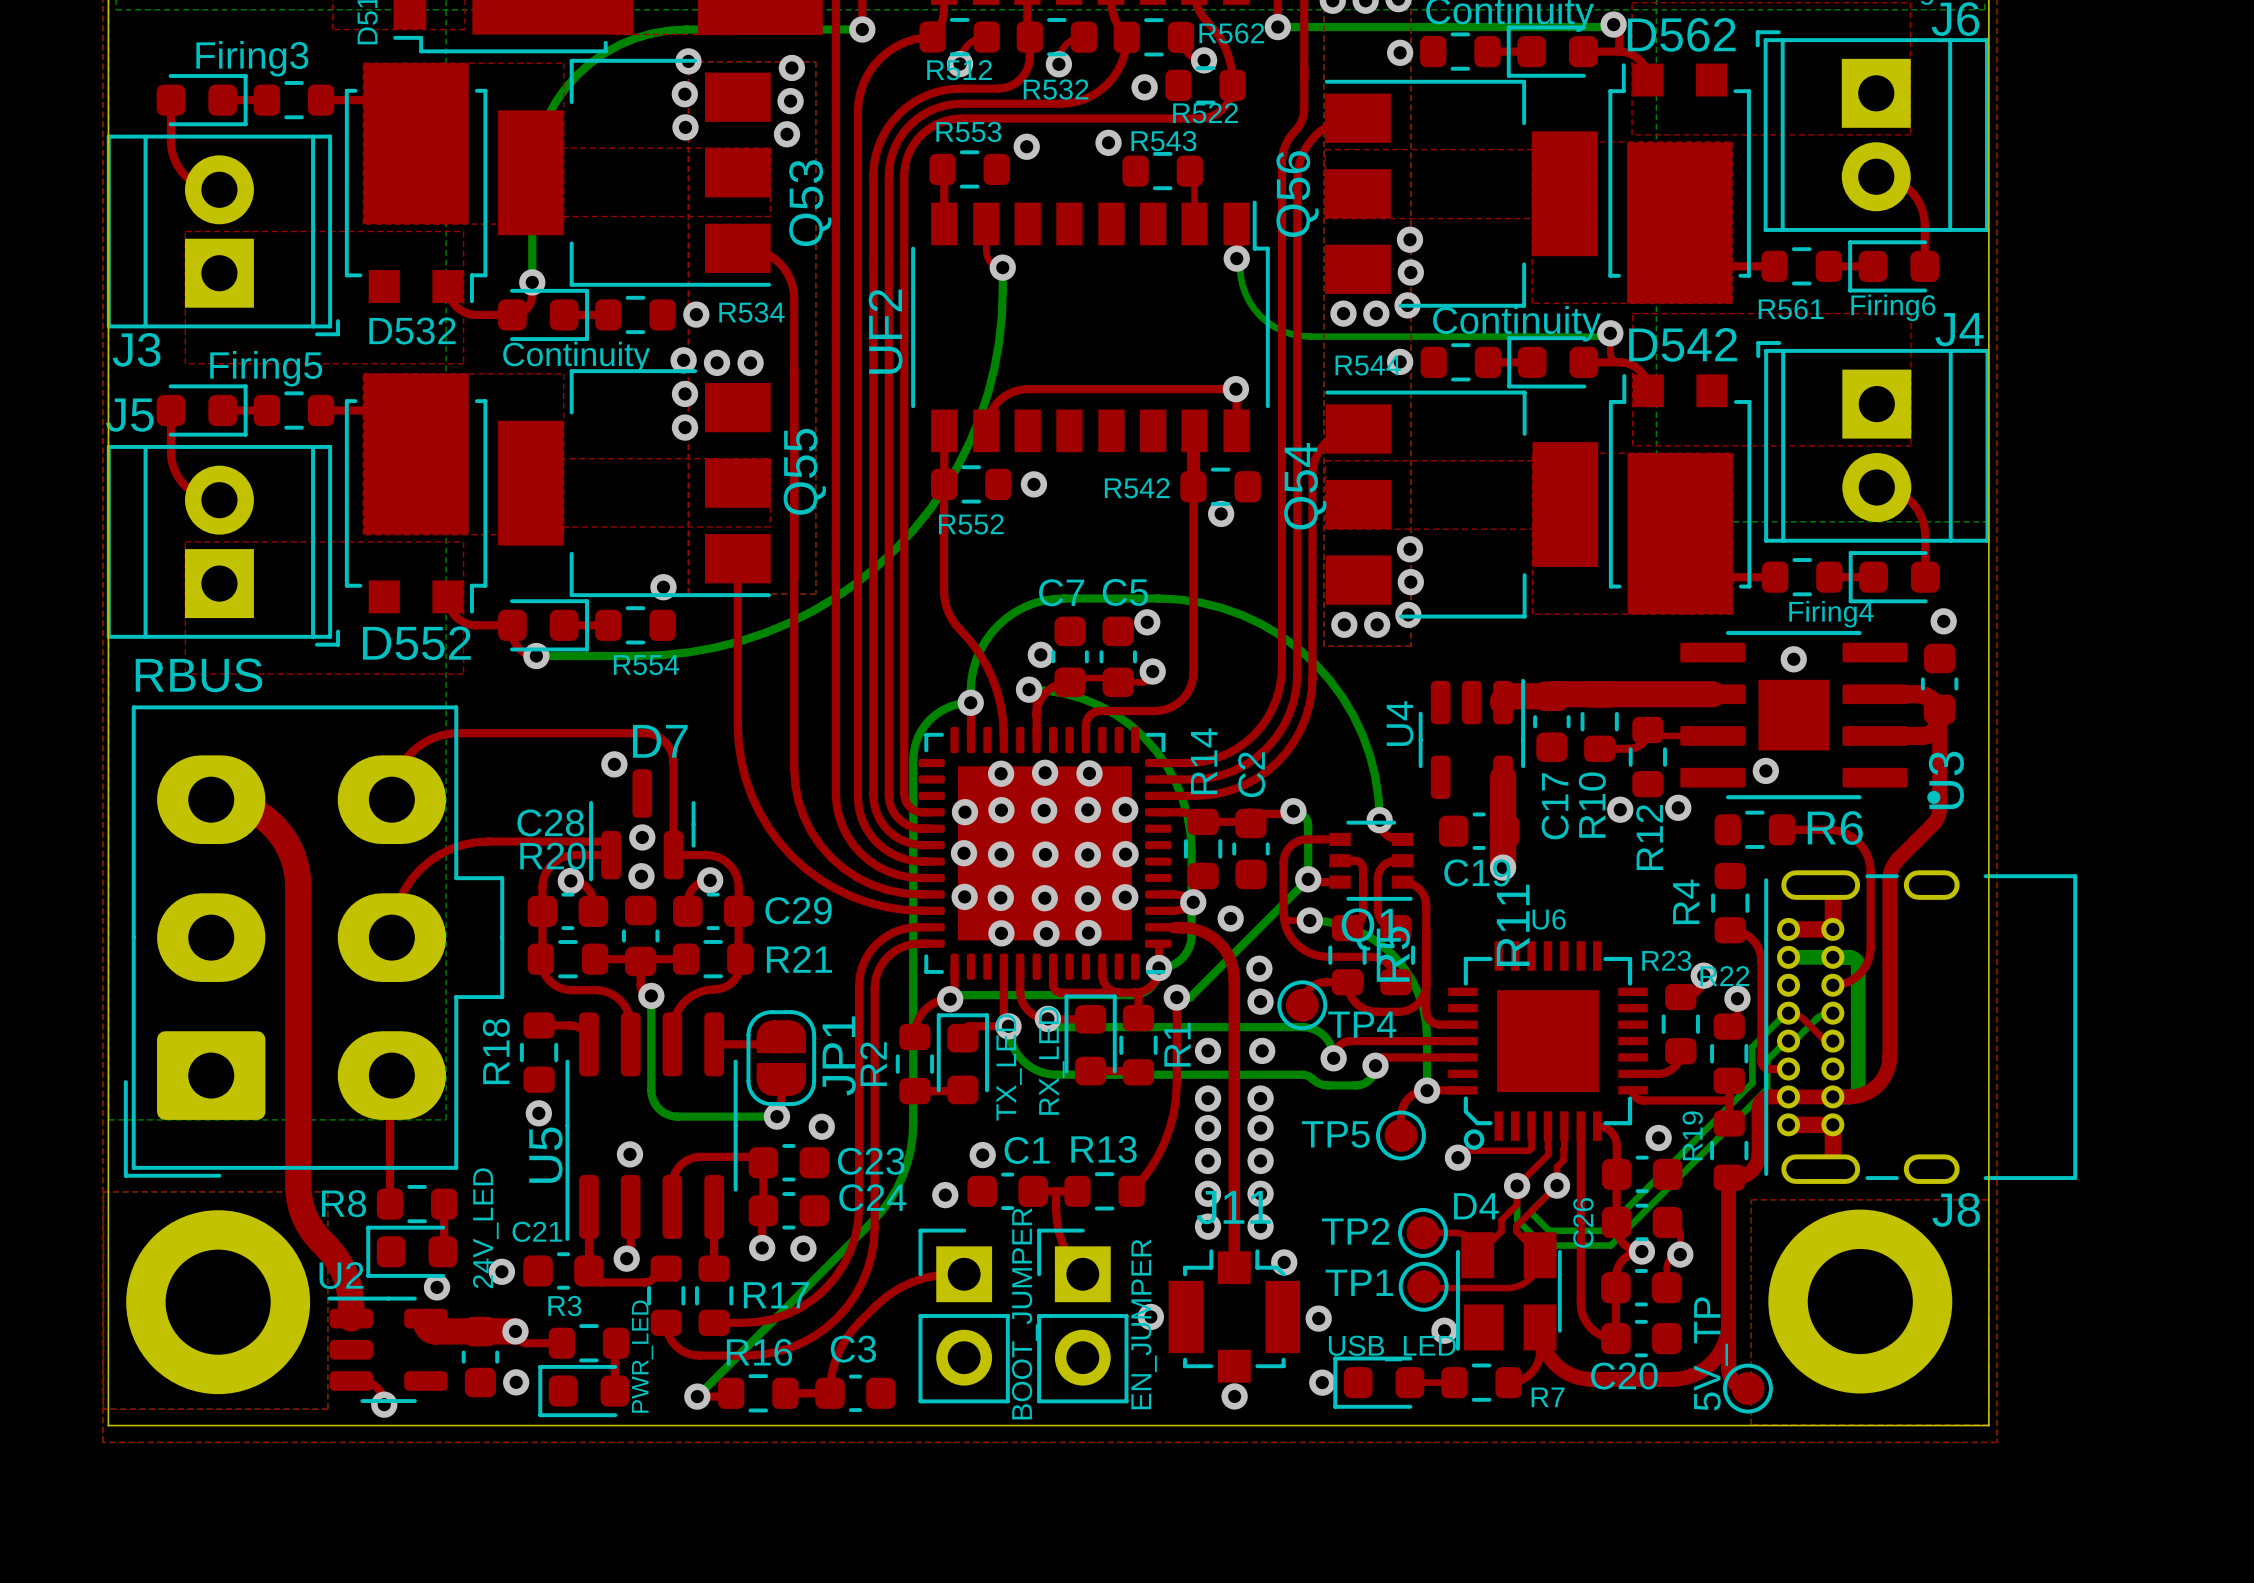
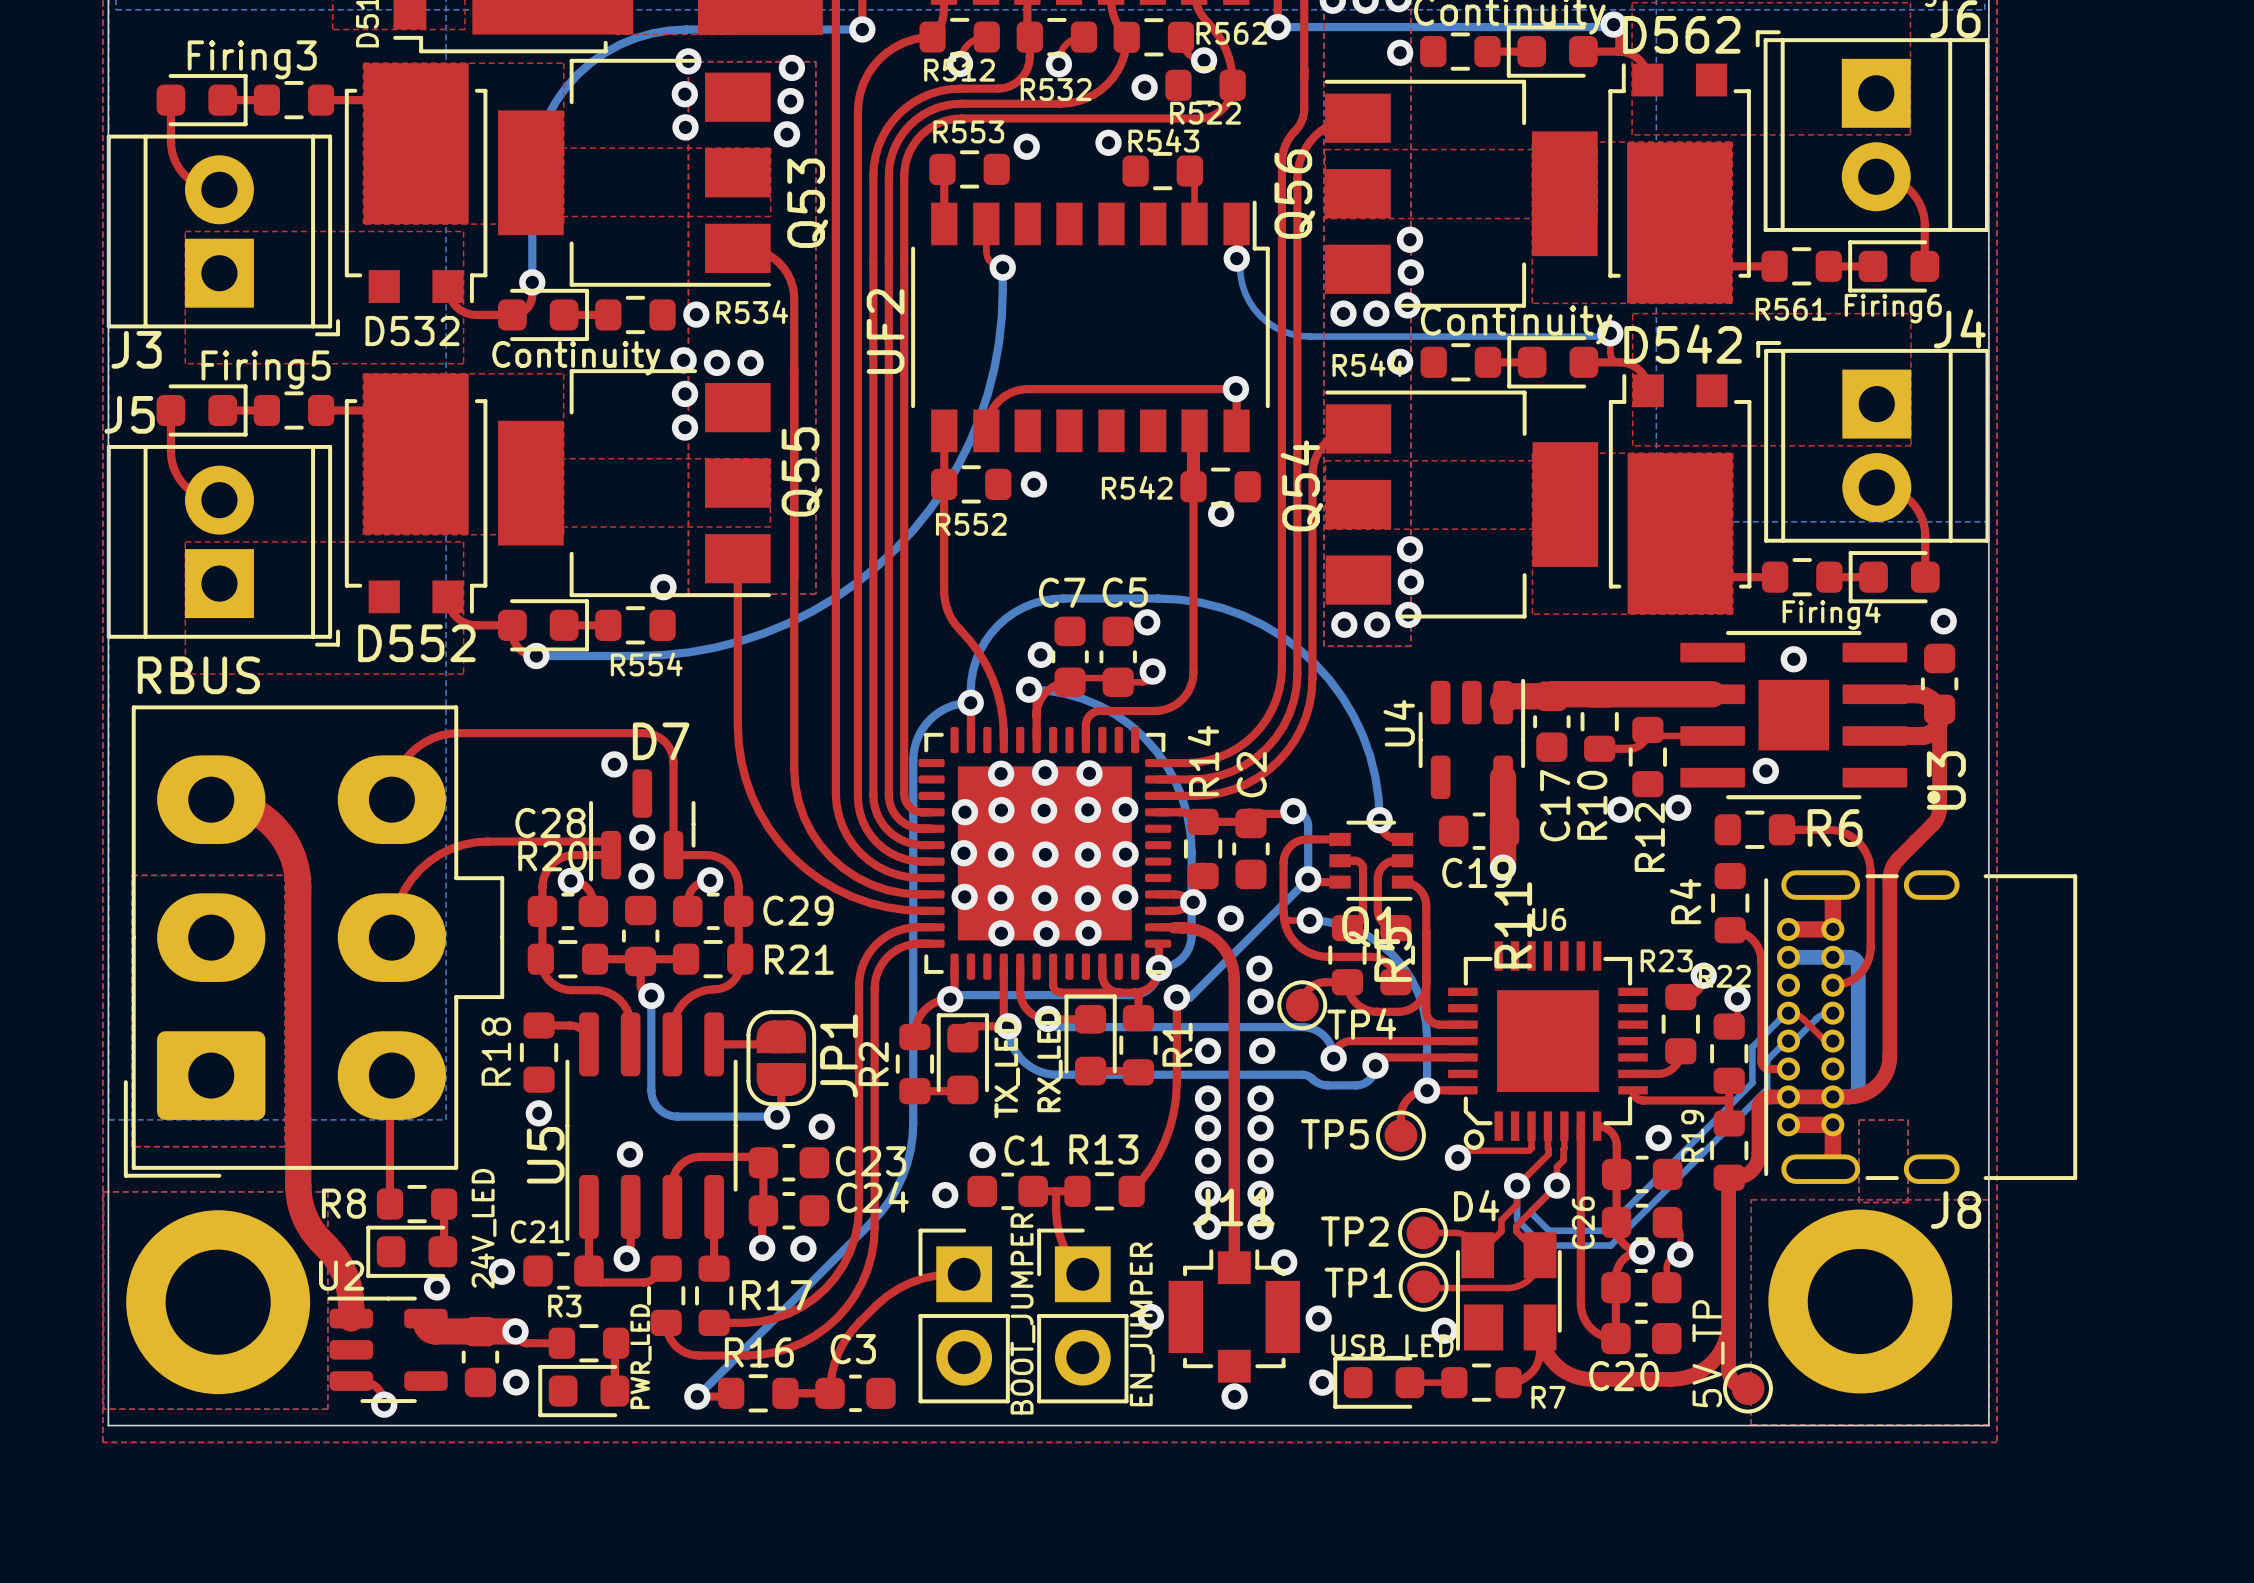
top zone outline: none -> (131, 875) (131, 1146) (285, 1146) (285, 875) (131, 875)
top zone outline: none -> (1859, 1120) (1859, 1202) (1908, 1202) (1908, 1120) (1859, 1120)

